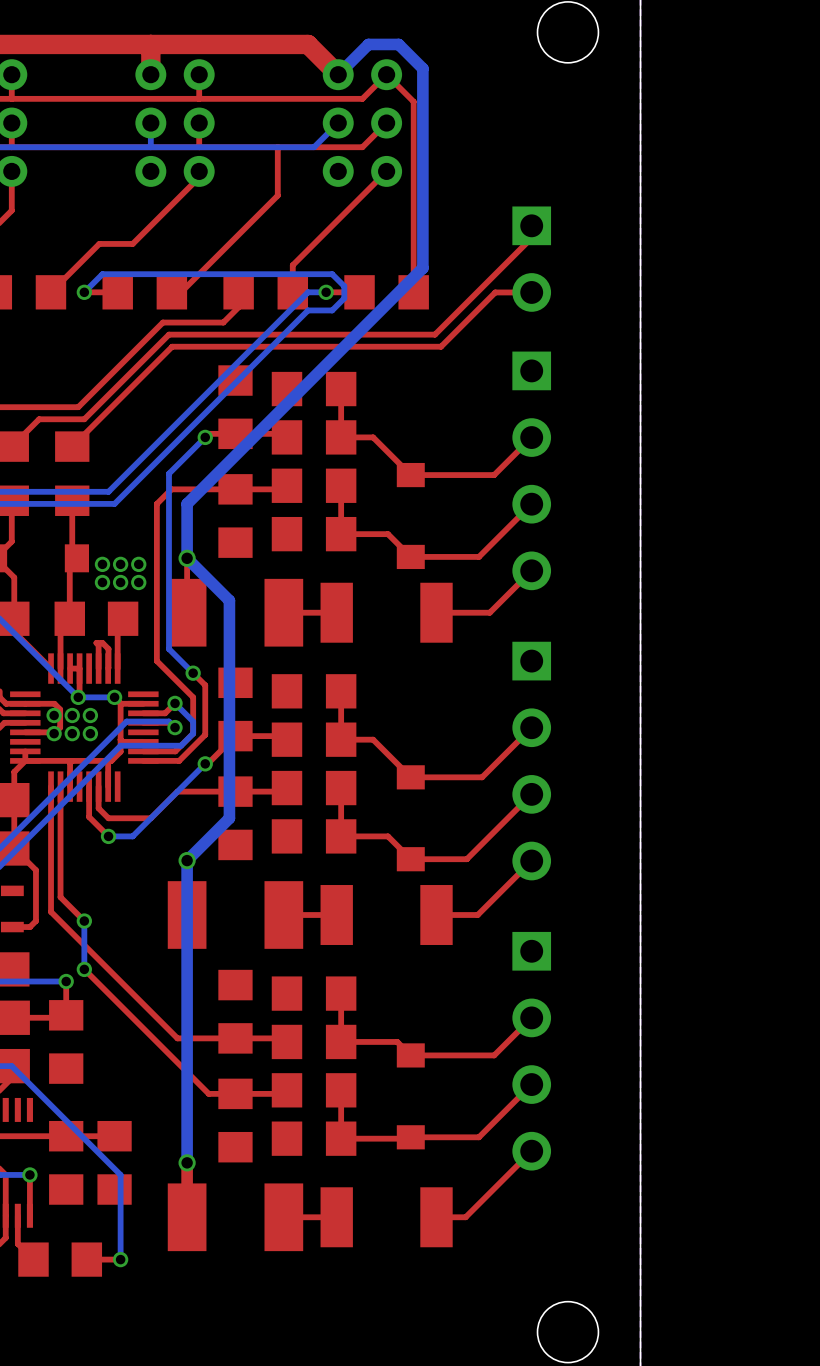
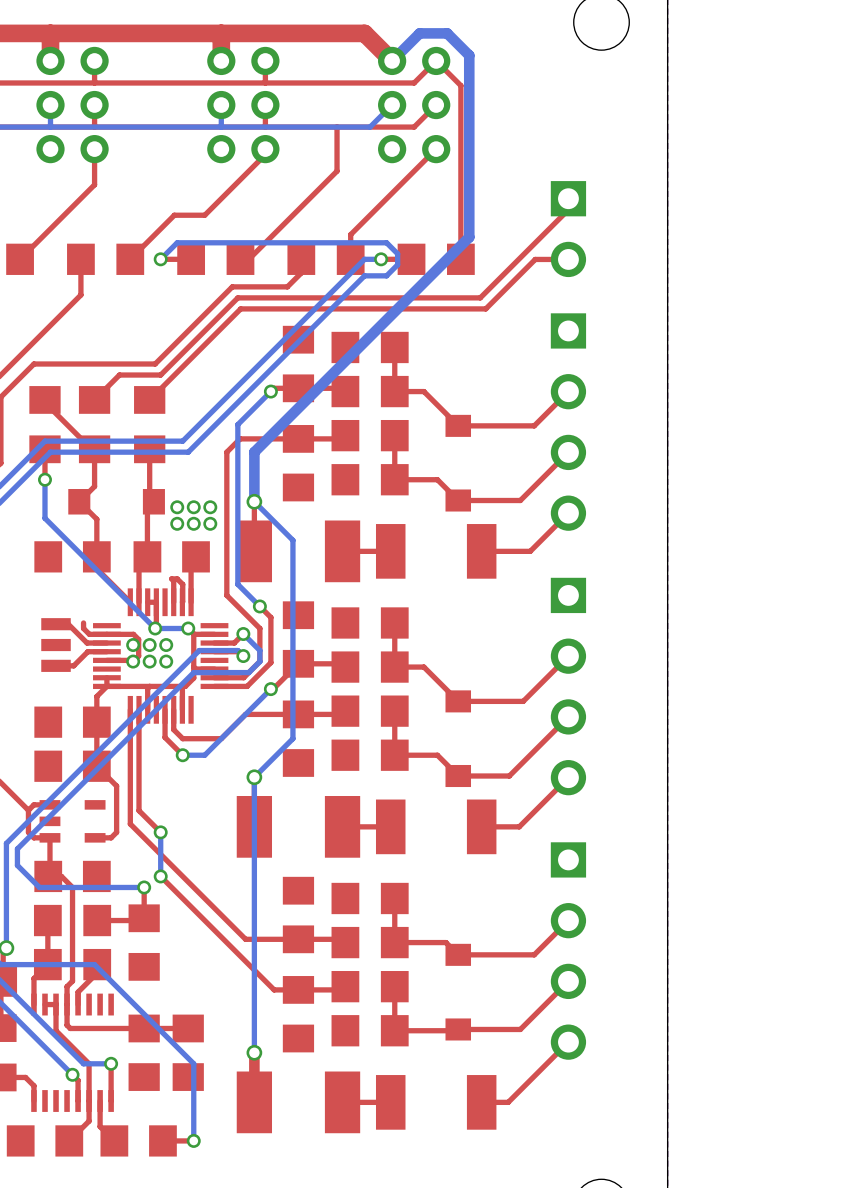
bottom track width: thick (187, 558) (229, 600) (229, 818) (187, 860) (187, 1162) -> thin (254, 501) (292, 540) (292, 738) (254, 777) (254, 1052)

